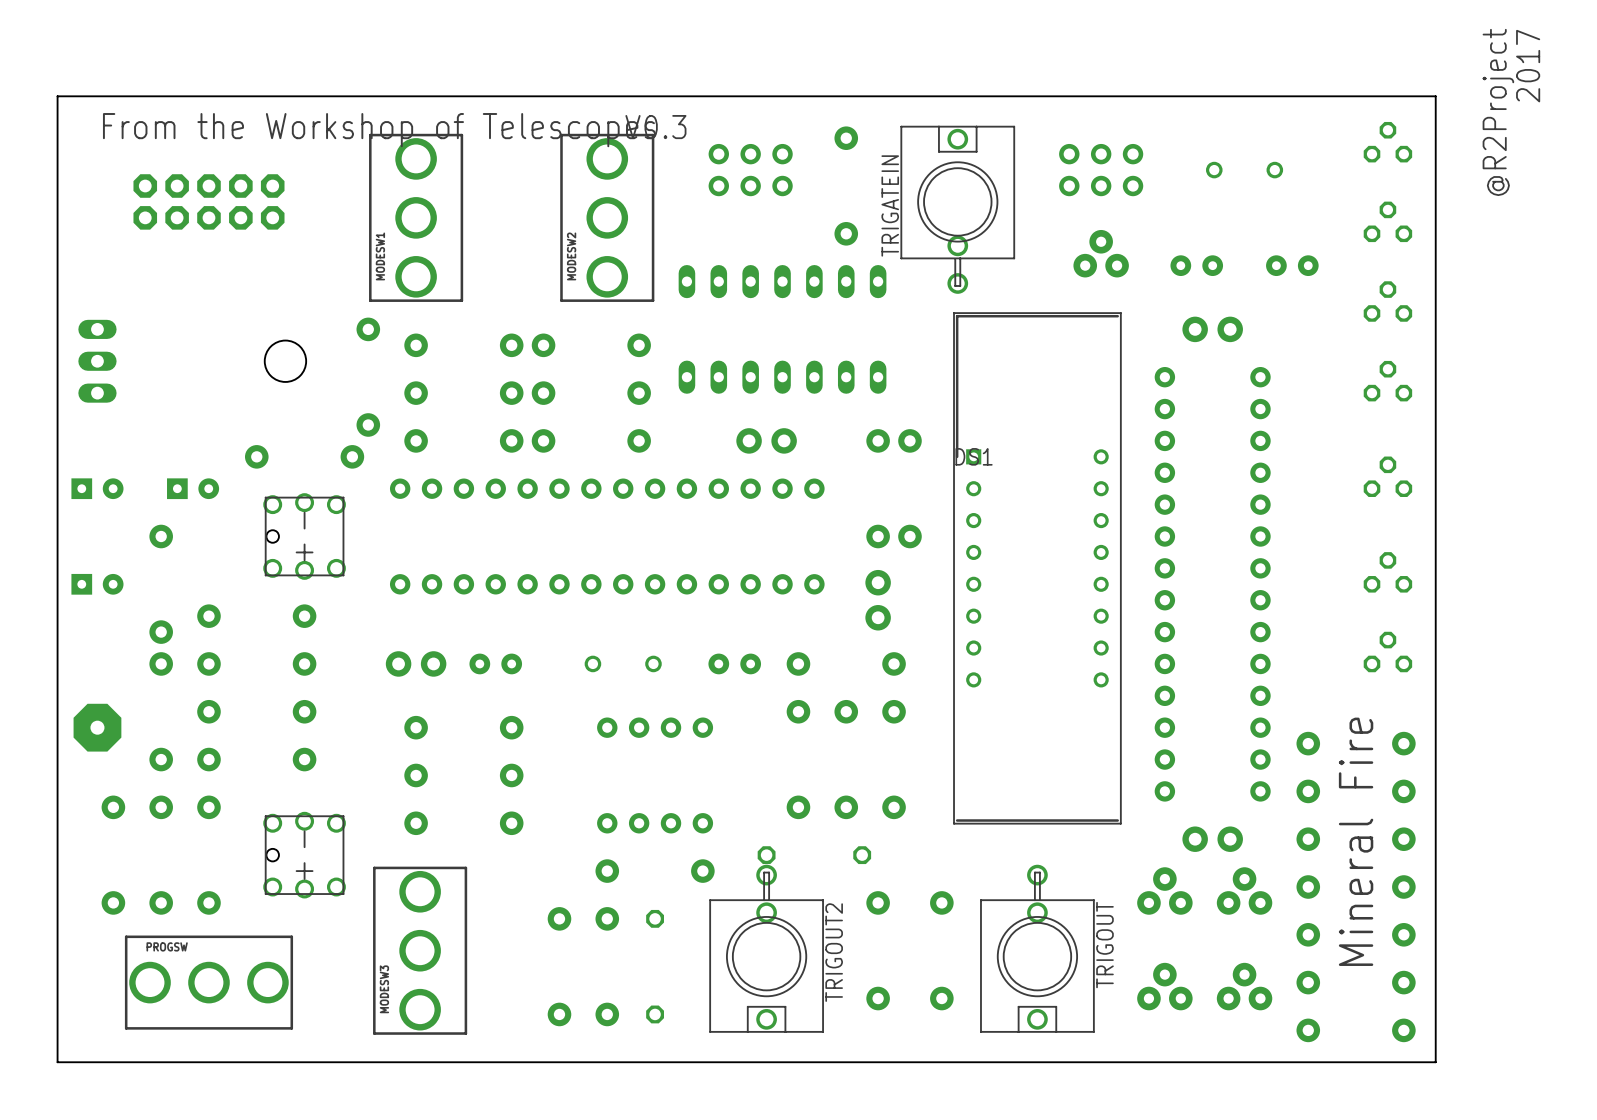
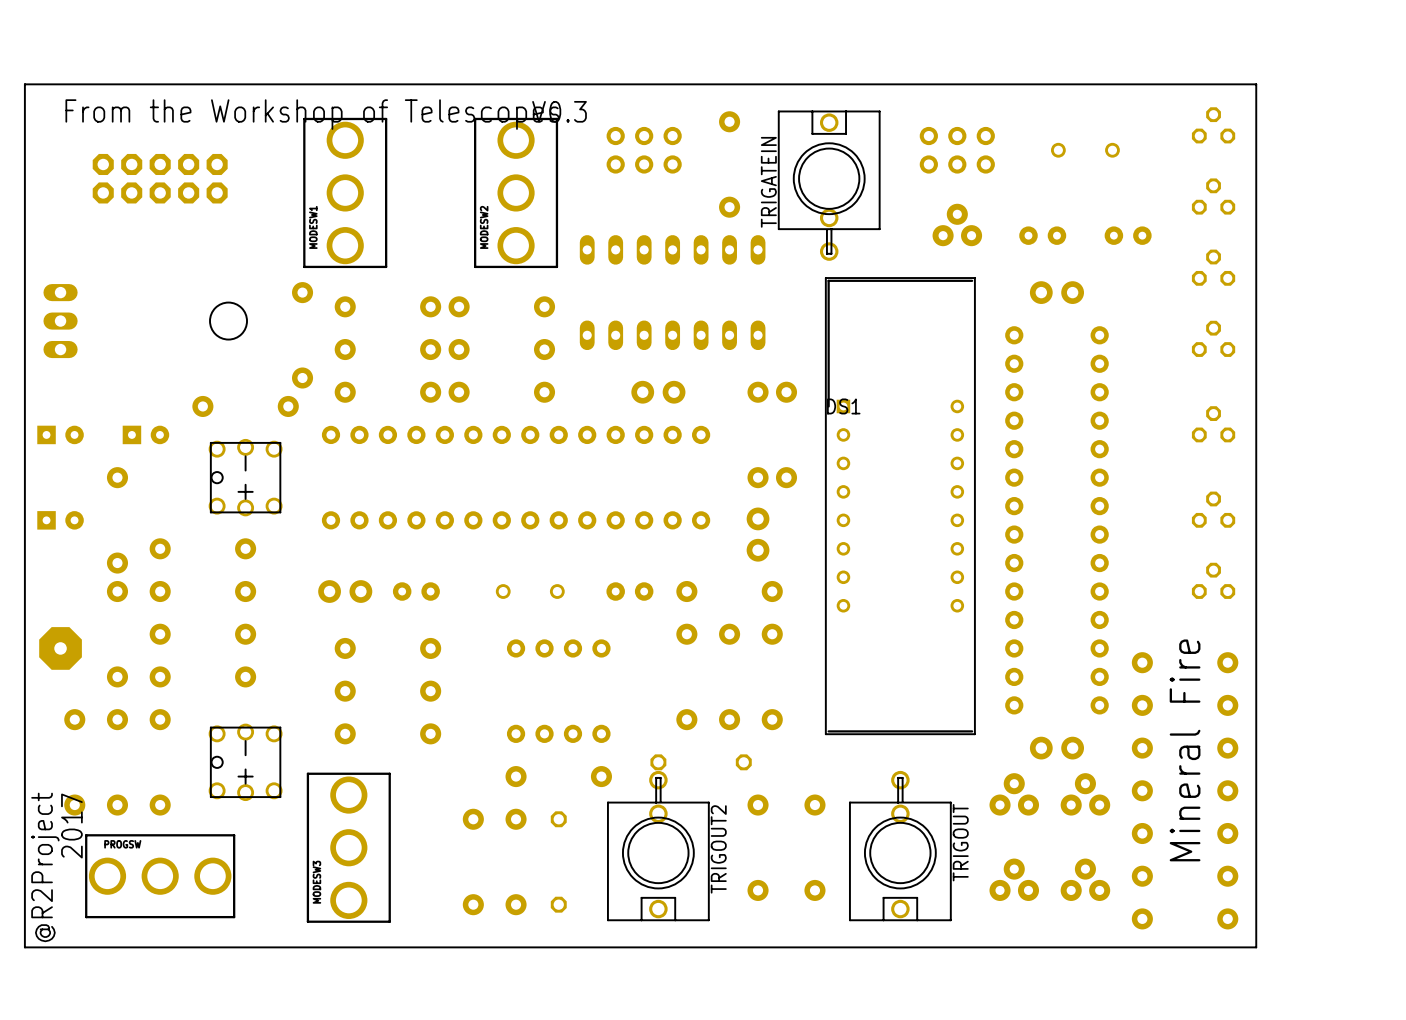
text: 2017 (1528, 66) -> none
text: @R2Project (1498, 112) -> none
text: none -> 2017 (71, 826)
text: none -> @R2Project (45, 867)

